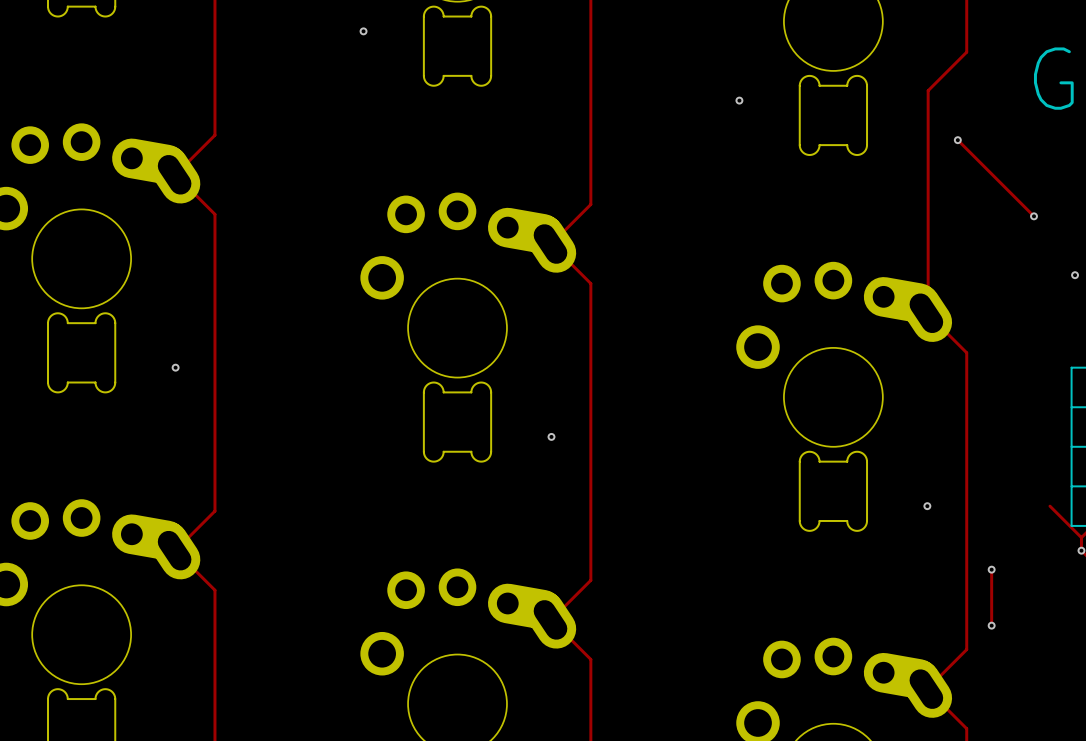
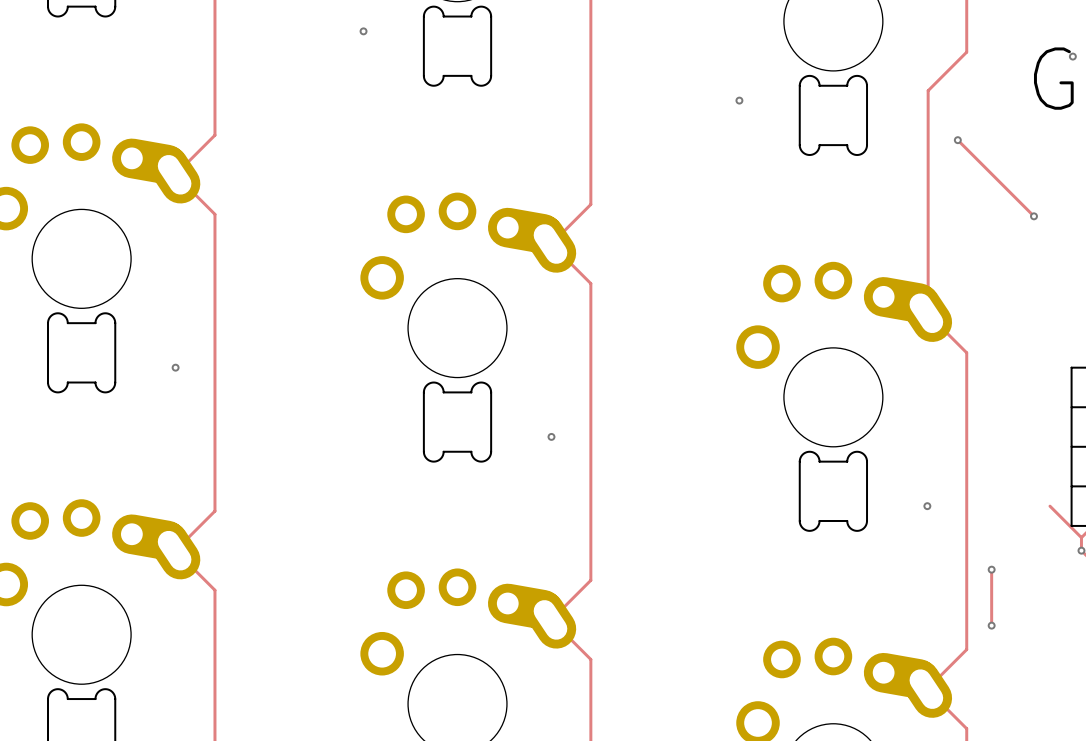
via: none -> (1072, 56)
via: (1075, 275) -> none

